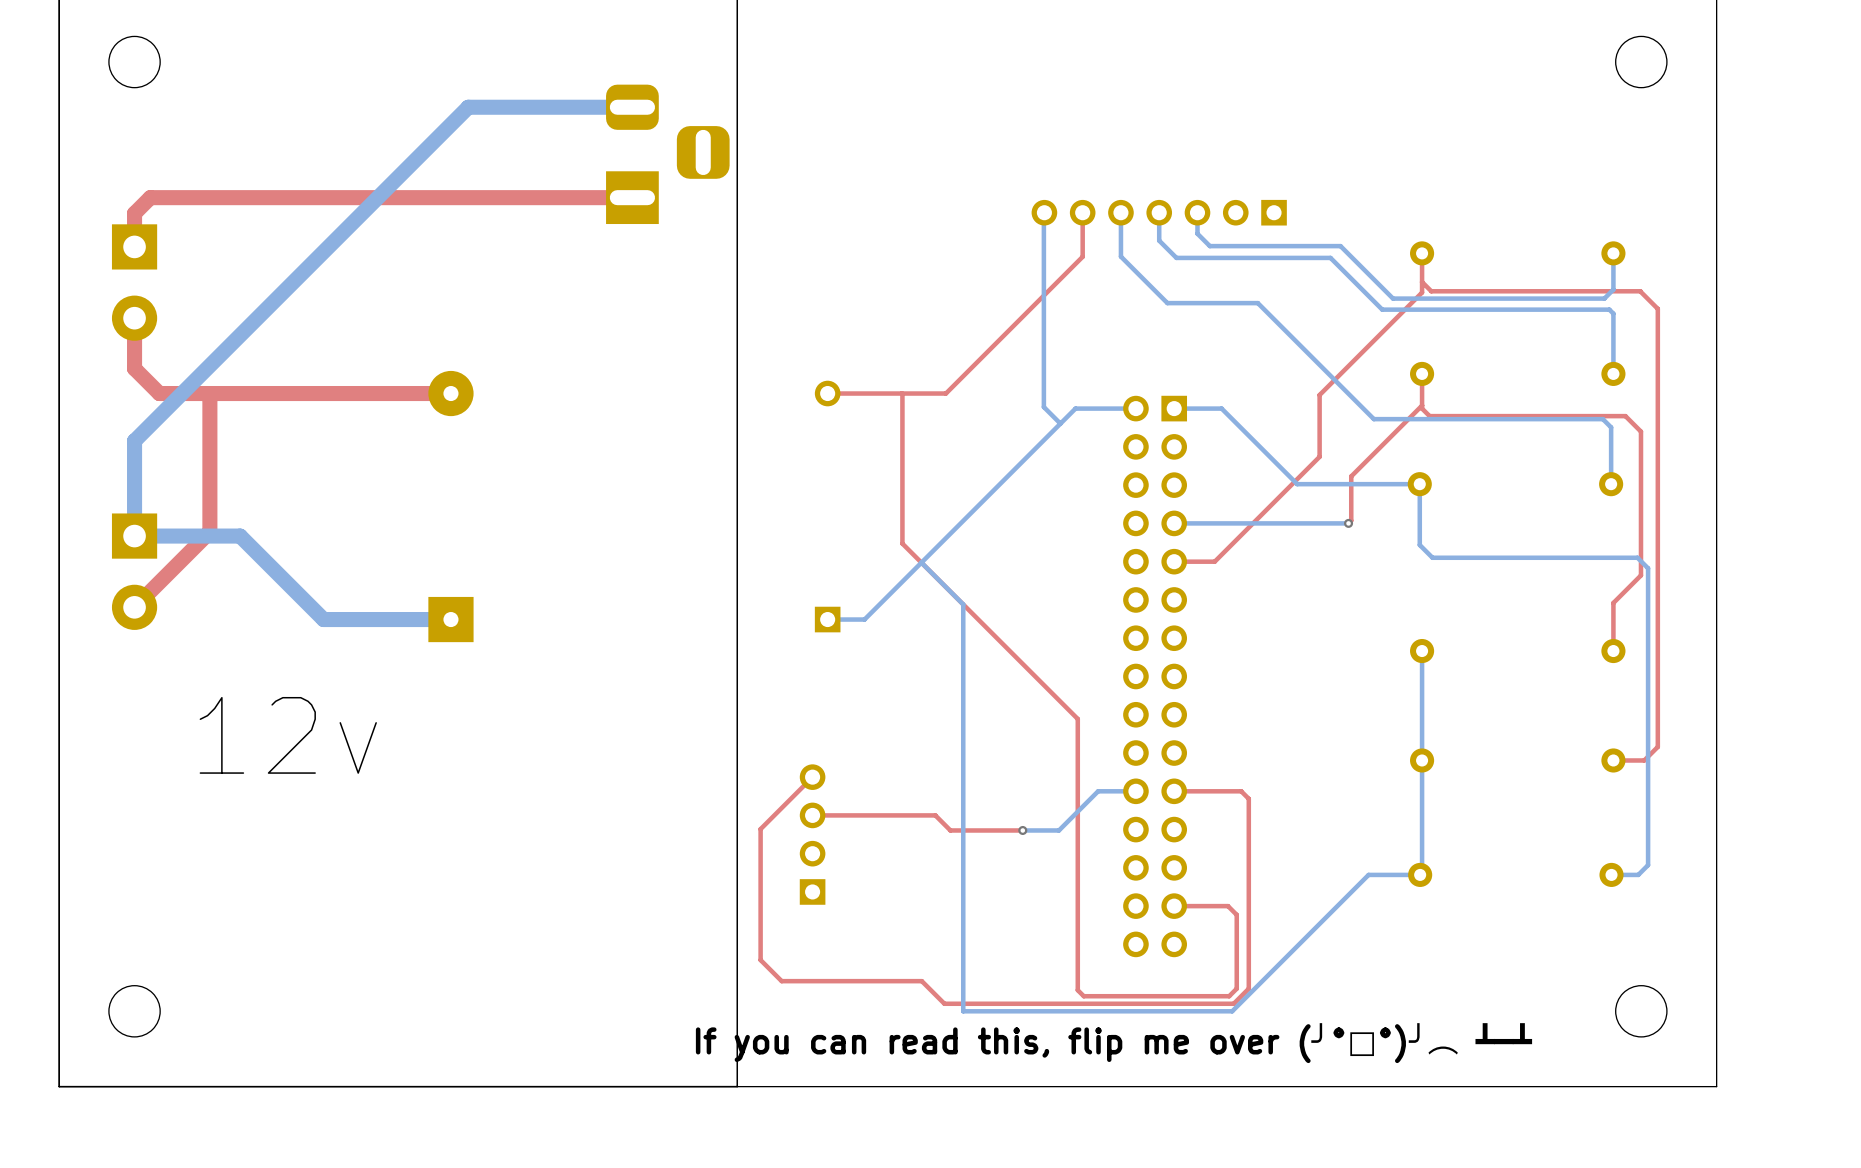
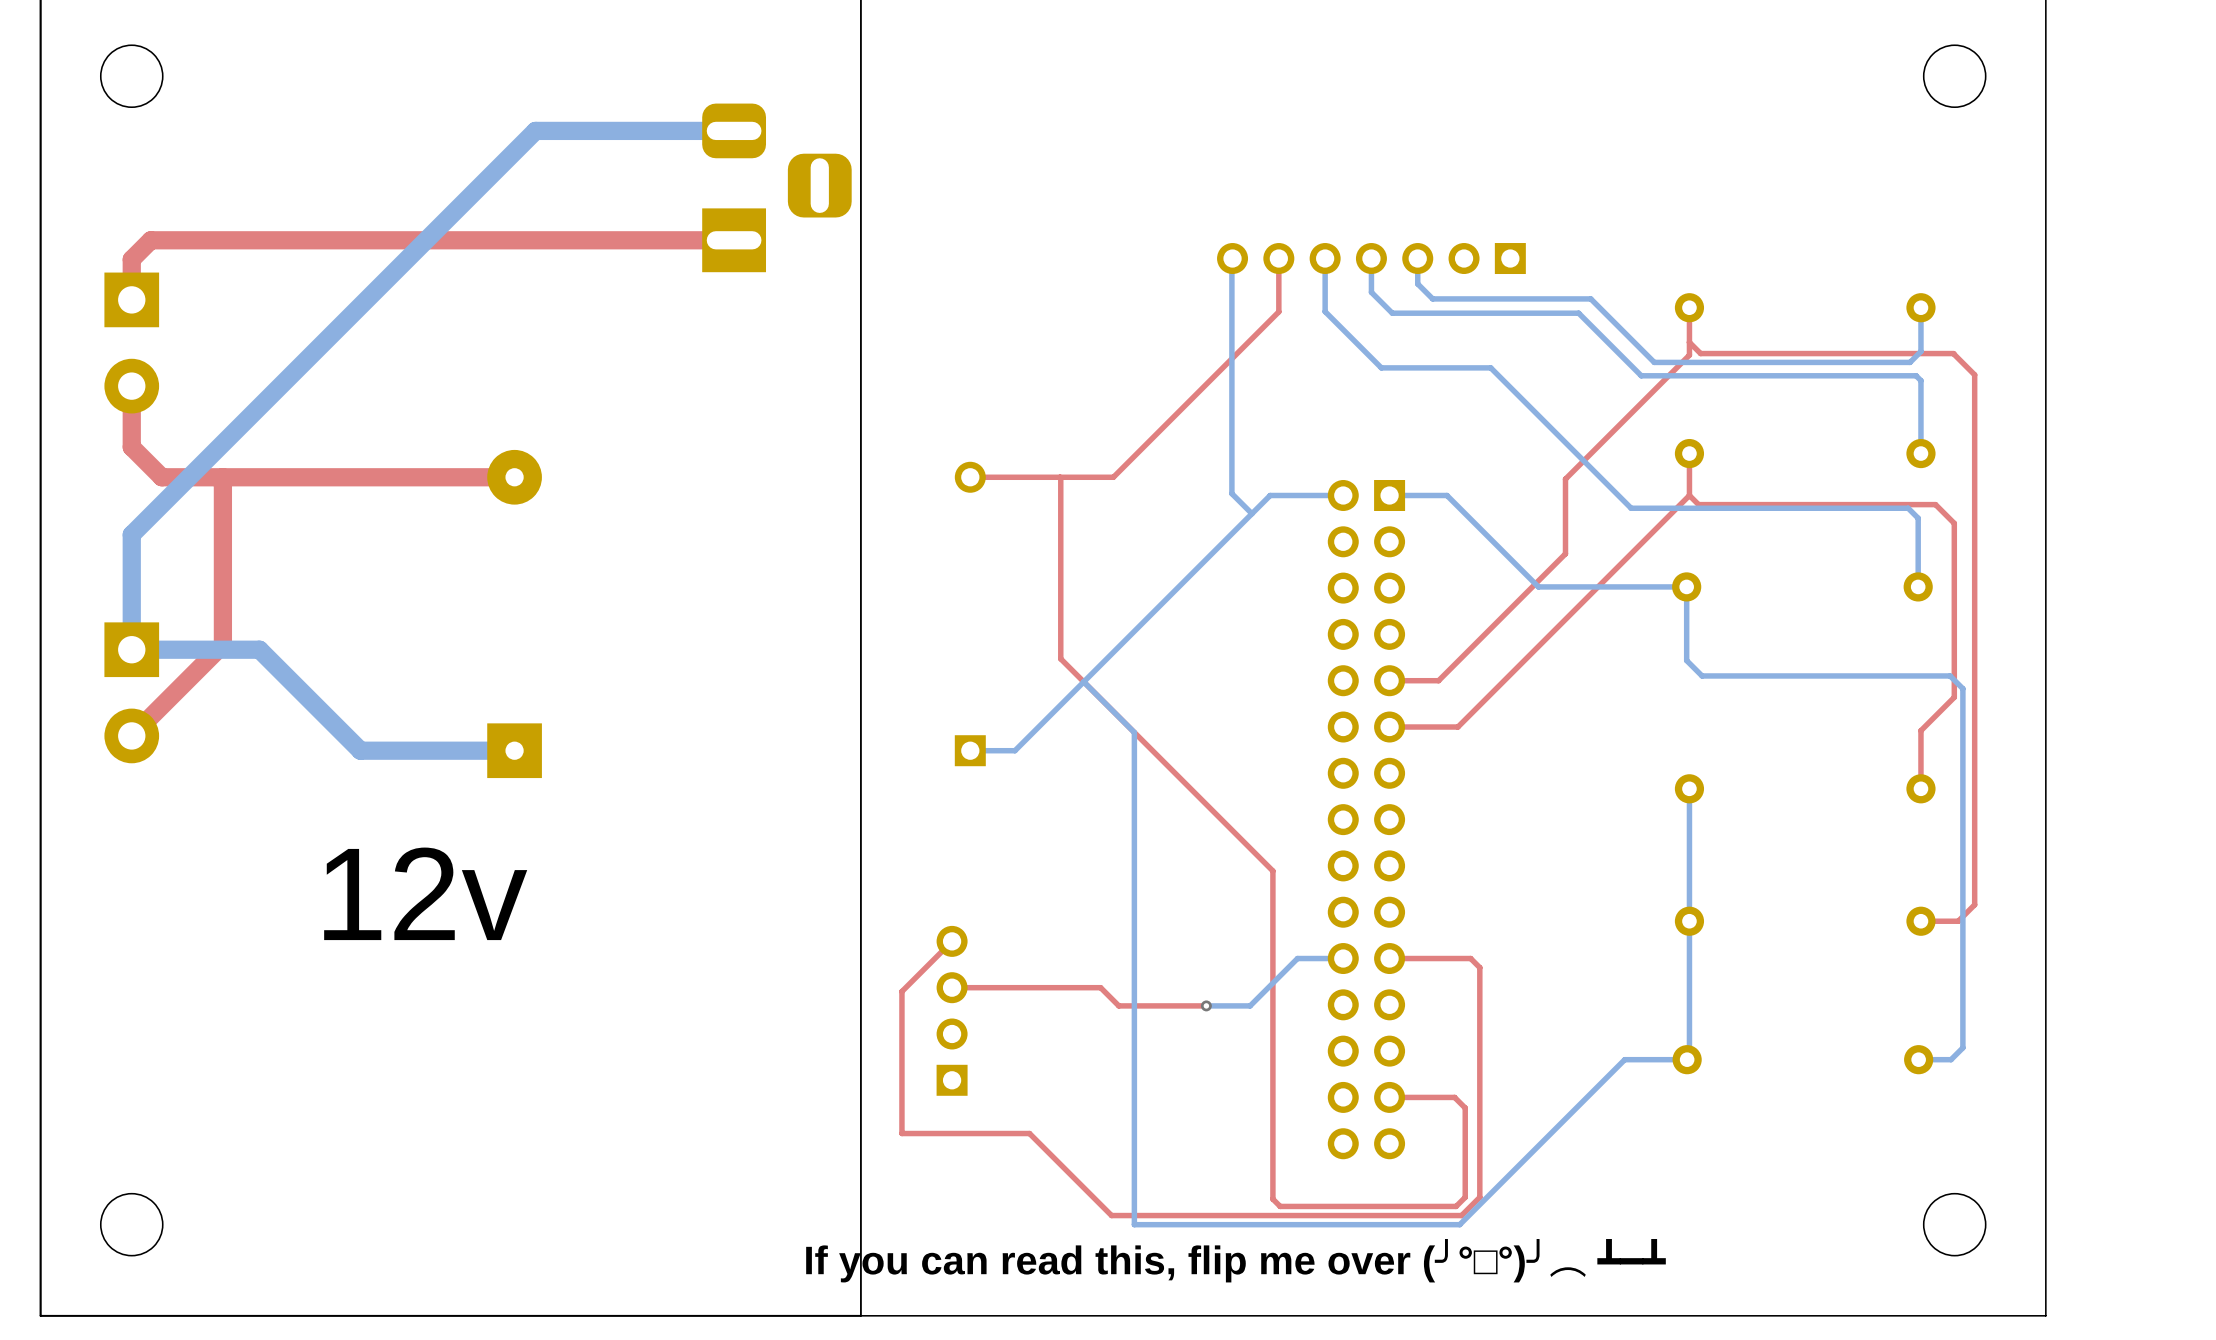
top track: (1422, 405) (1351, 476) (1351, 520) (1348, 523) -> none
top track: none -> (1689, 495) (1457, 727) (1389, 727)
bottom track: (1348, 523) (1174, 523) -> none
via: (1348, 523) -> none
text position: 12v (288, 735) -> 12v (425, 893)
top track: (771, 818) (760, 829) (760, 960) (781, 981) (921, 981) -> (901, 991) (901, 1133) (1029, 1133) (1084, 1188)

